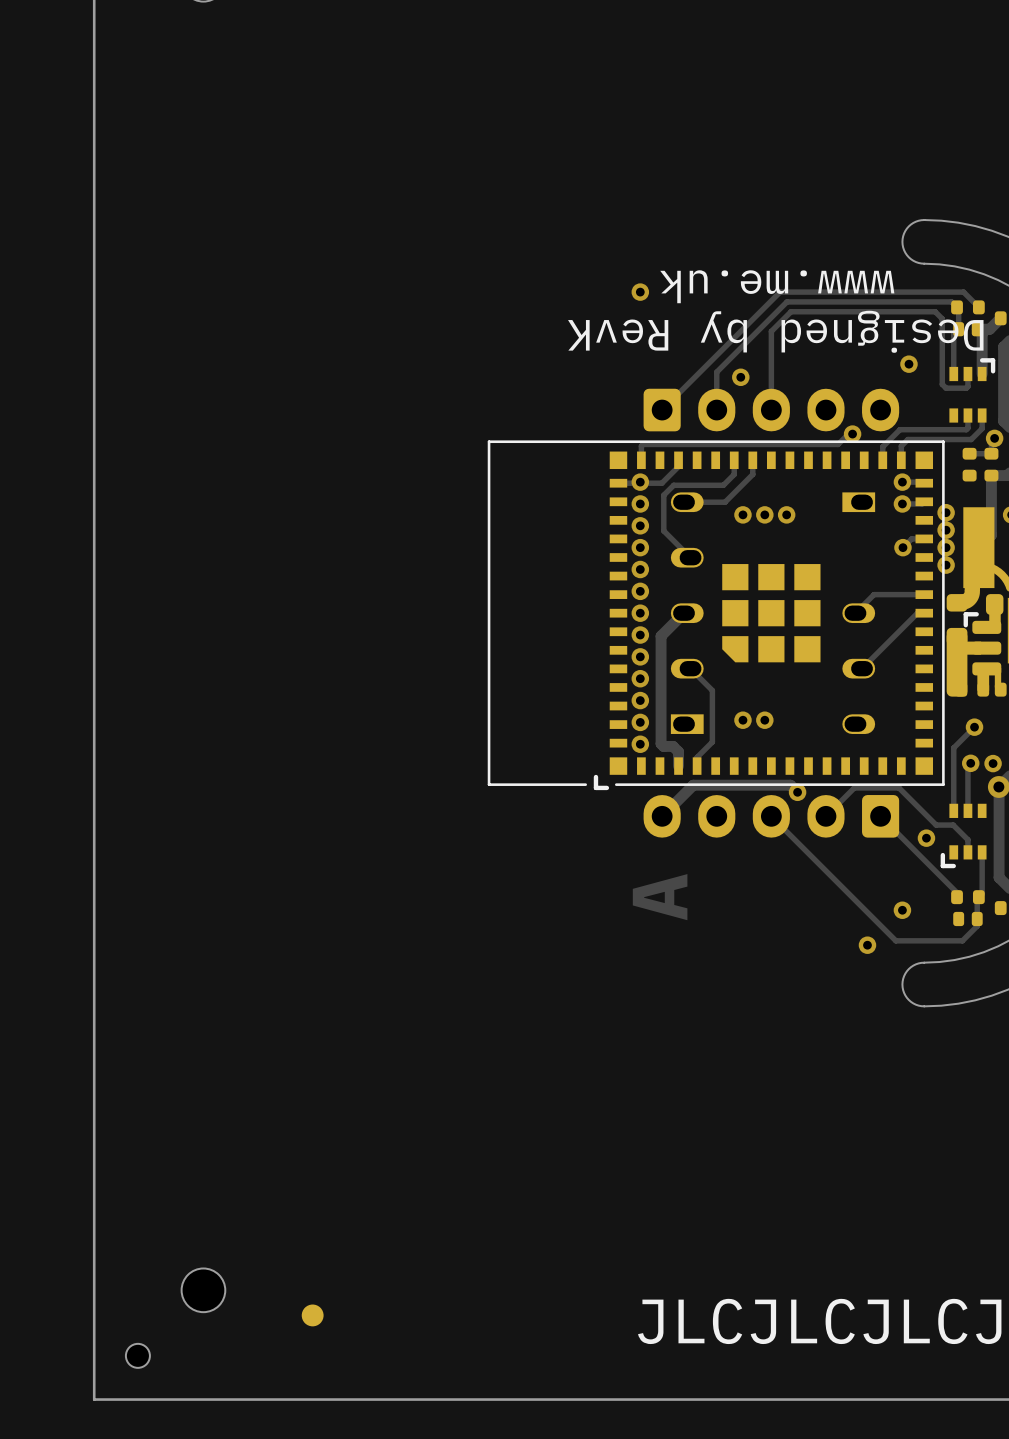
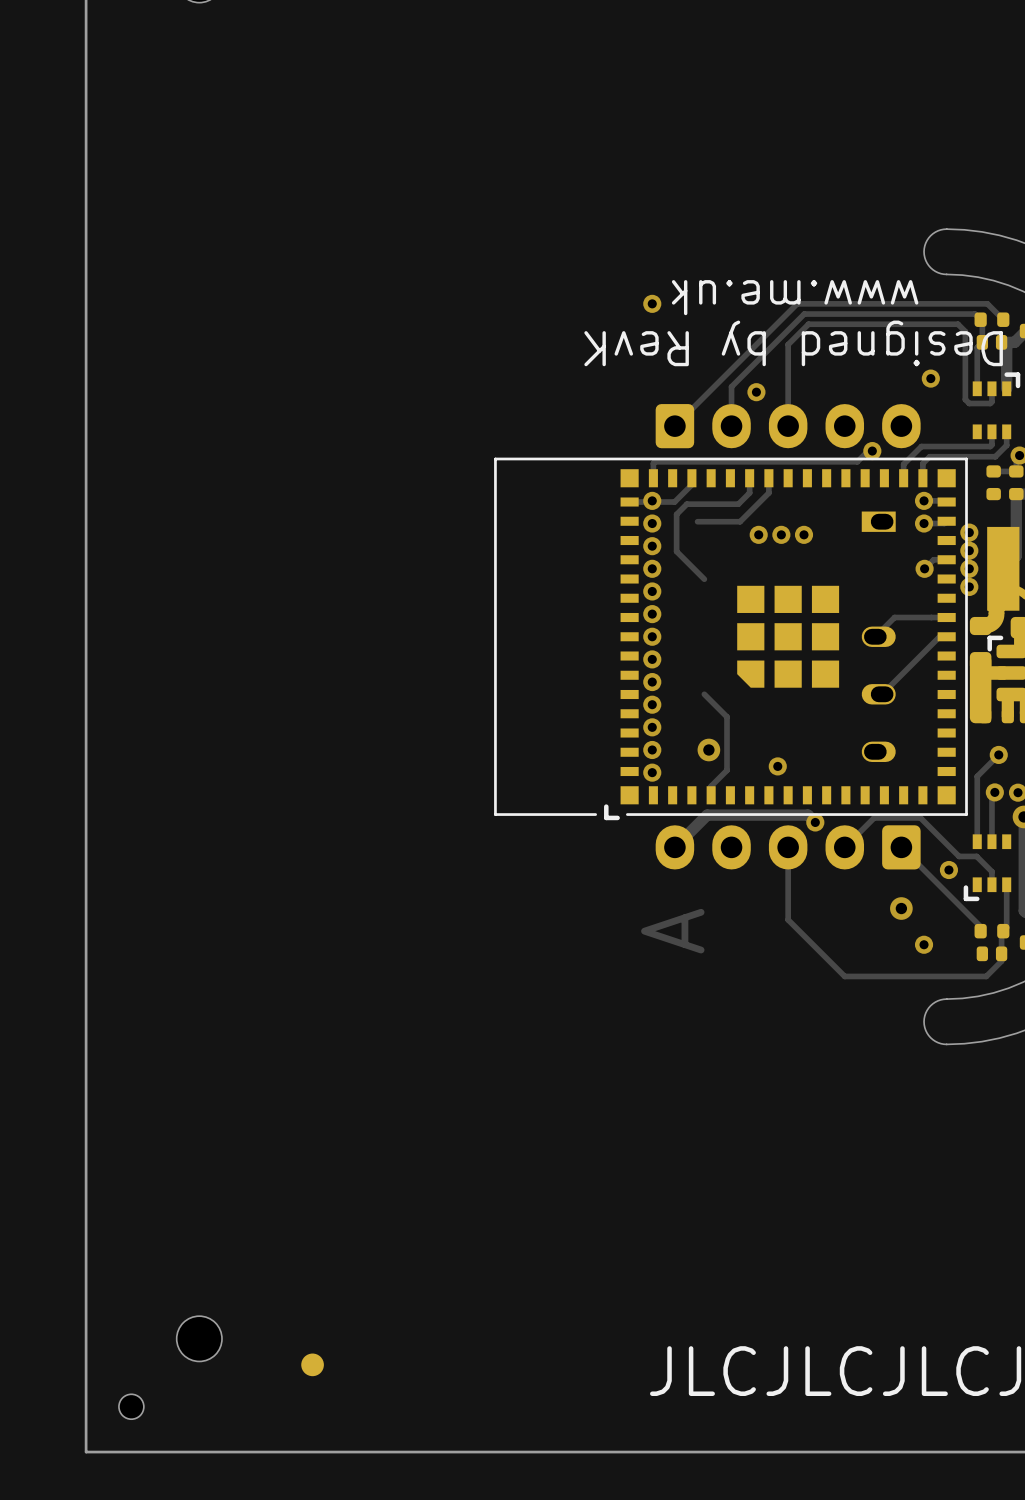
track: (684, 613) (661, 636) (661, 743) (663, 746) (673, 746) (678, 751) (678, 766) -> none
part: (687, 613) -> none
via: (742, 720) -> none
via: (764, 720) -> none
via: none -> (708, 749)
via: none -> (777, 766)
track: (771, 816) (895, 940) -> (788, 847) (788, 919) (844, 976) (917, 976)
via: none -> (901, 908)
via: (867, 945) -> none

